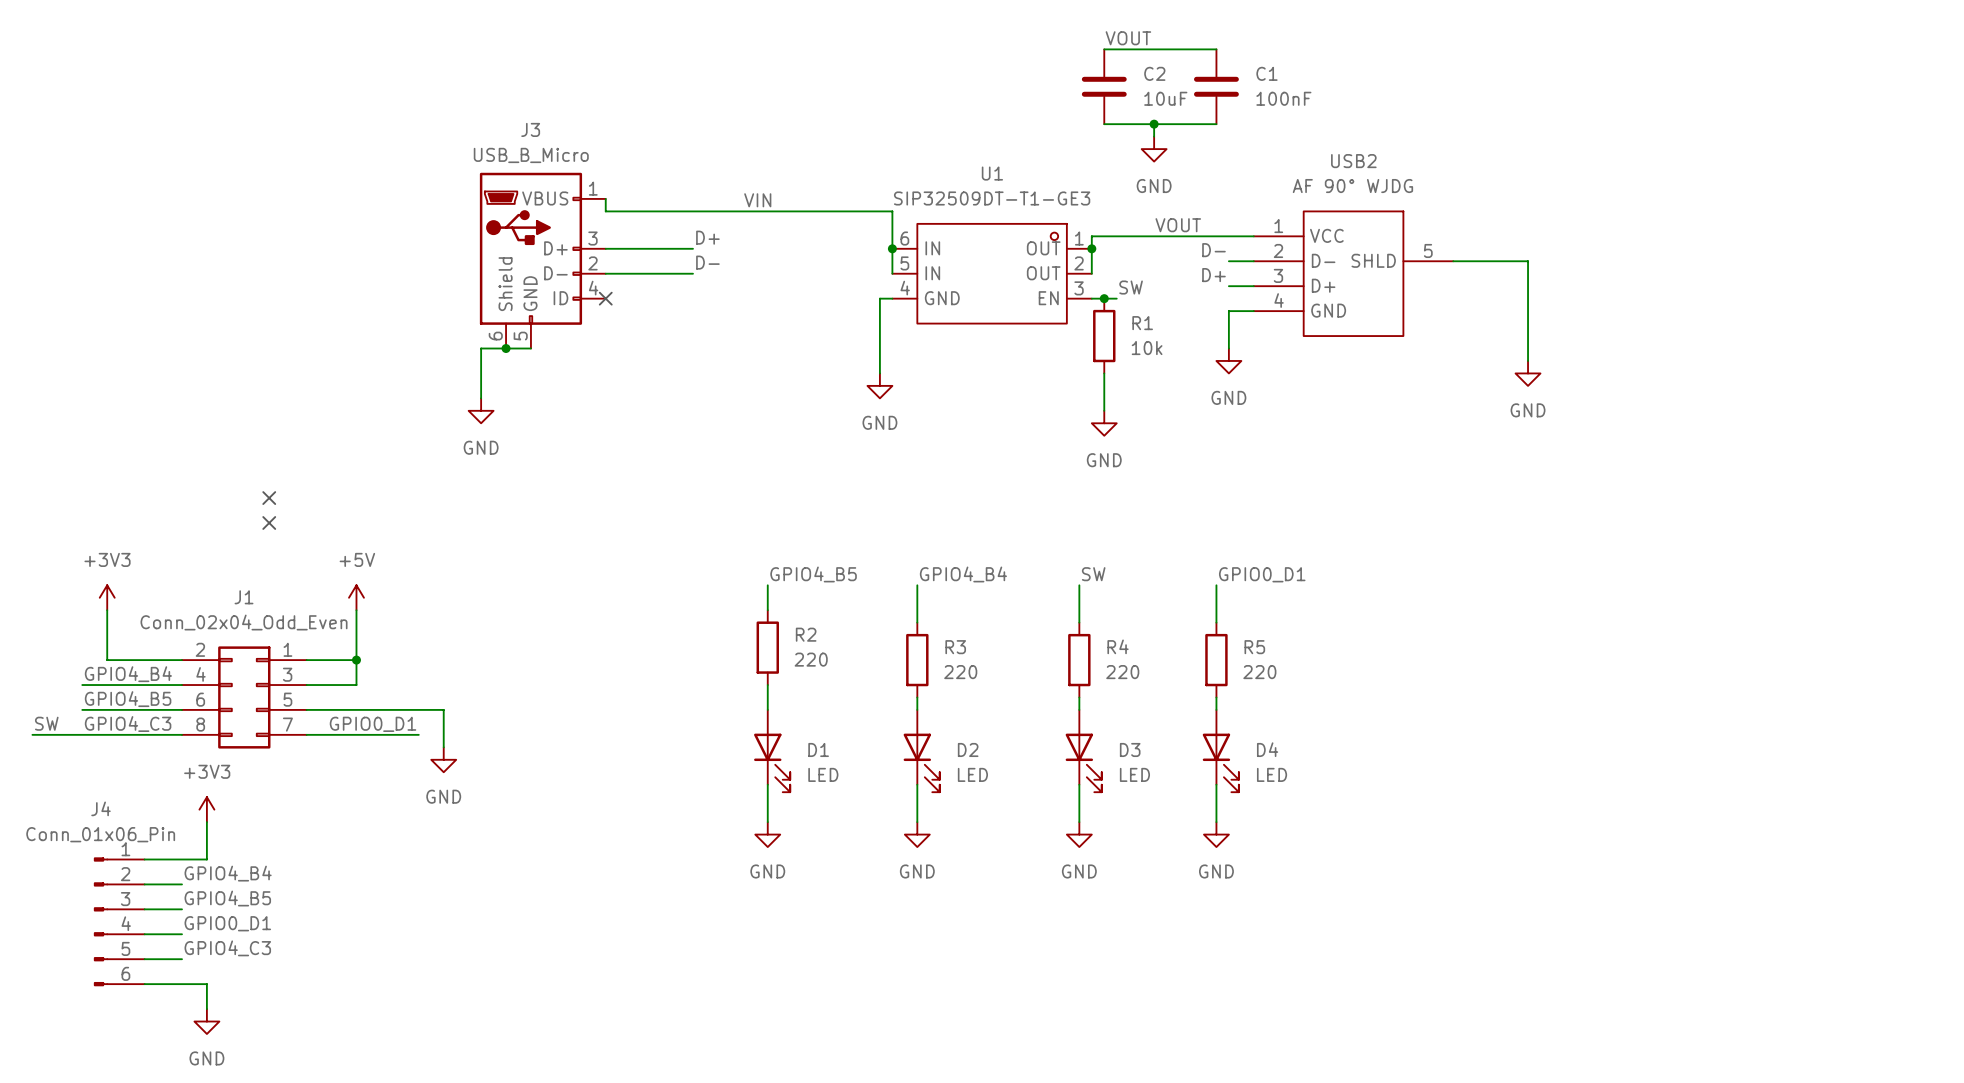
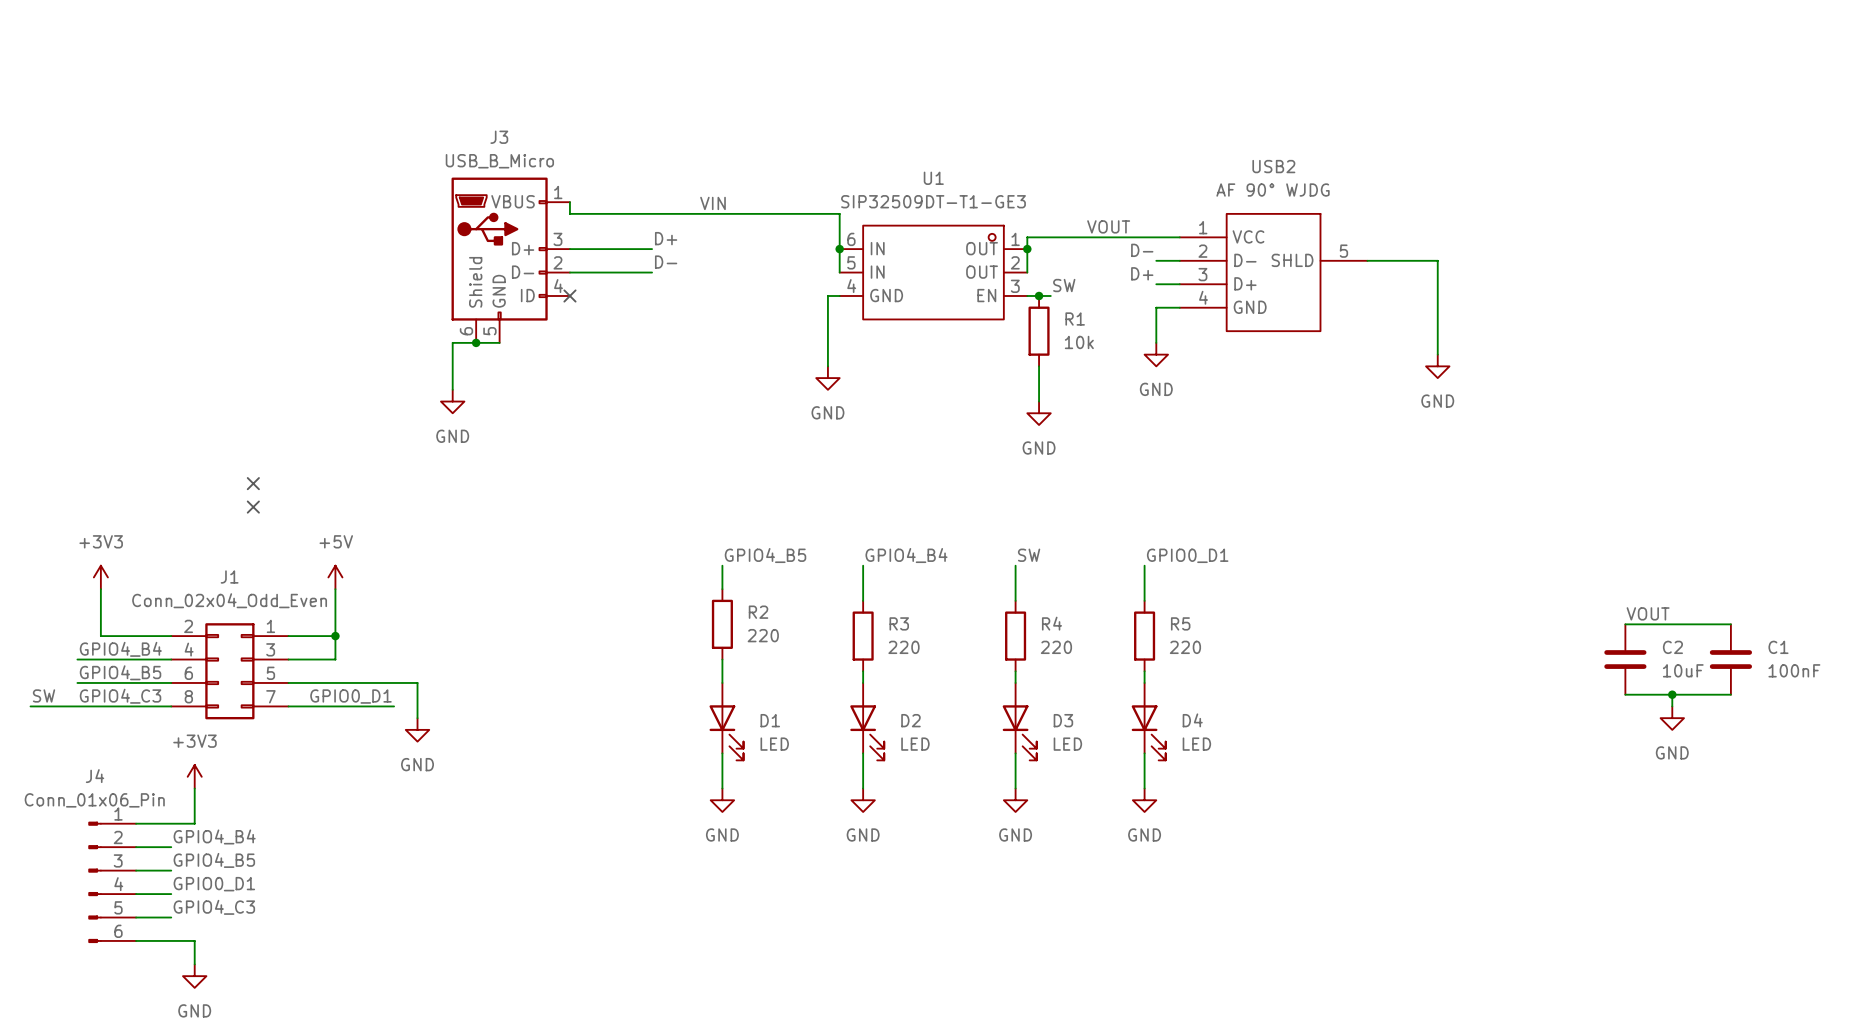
label: VOUT (1128, 38) -> none
wire: (1104, 49) (1216, 49) -> none
C2 position: (1104, 86) -> (1625, 659)
C1 position: (1216, 86) -> (1730, 659)
wire: (1104, 124) (1216, 124) -> none
wire: (1154, 124) (1154, 136) -> none
junction: (1154, 124) -> none
power symbol: GND (1154, 149) -> none
label: none -> VOUT (1648, 613)
wire: none -> (1625, 624) (1730, 624)
wire: none -> (1625, 694) (1730, 694)
wire: none -> (1672, 694) (1672, 706)
junction: none -> (1672, 694)
power symbol: none -> GND (1672, 718)

